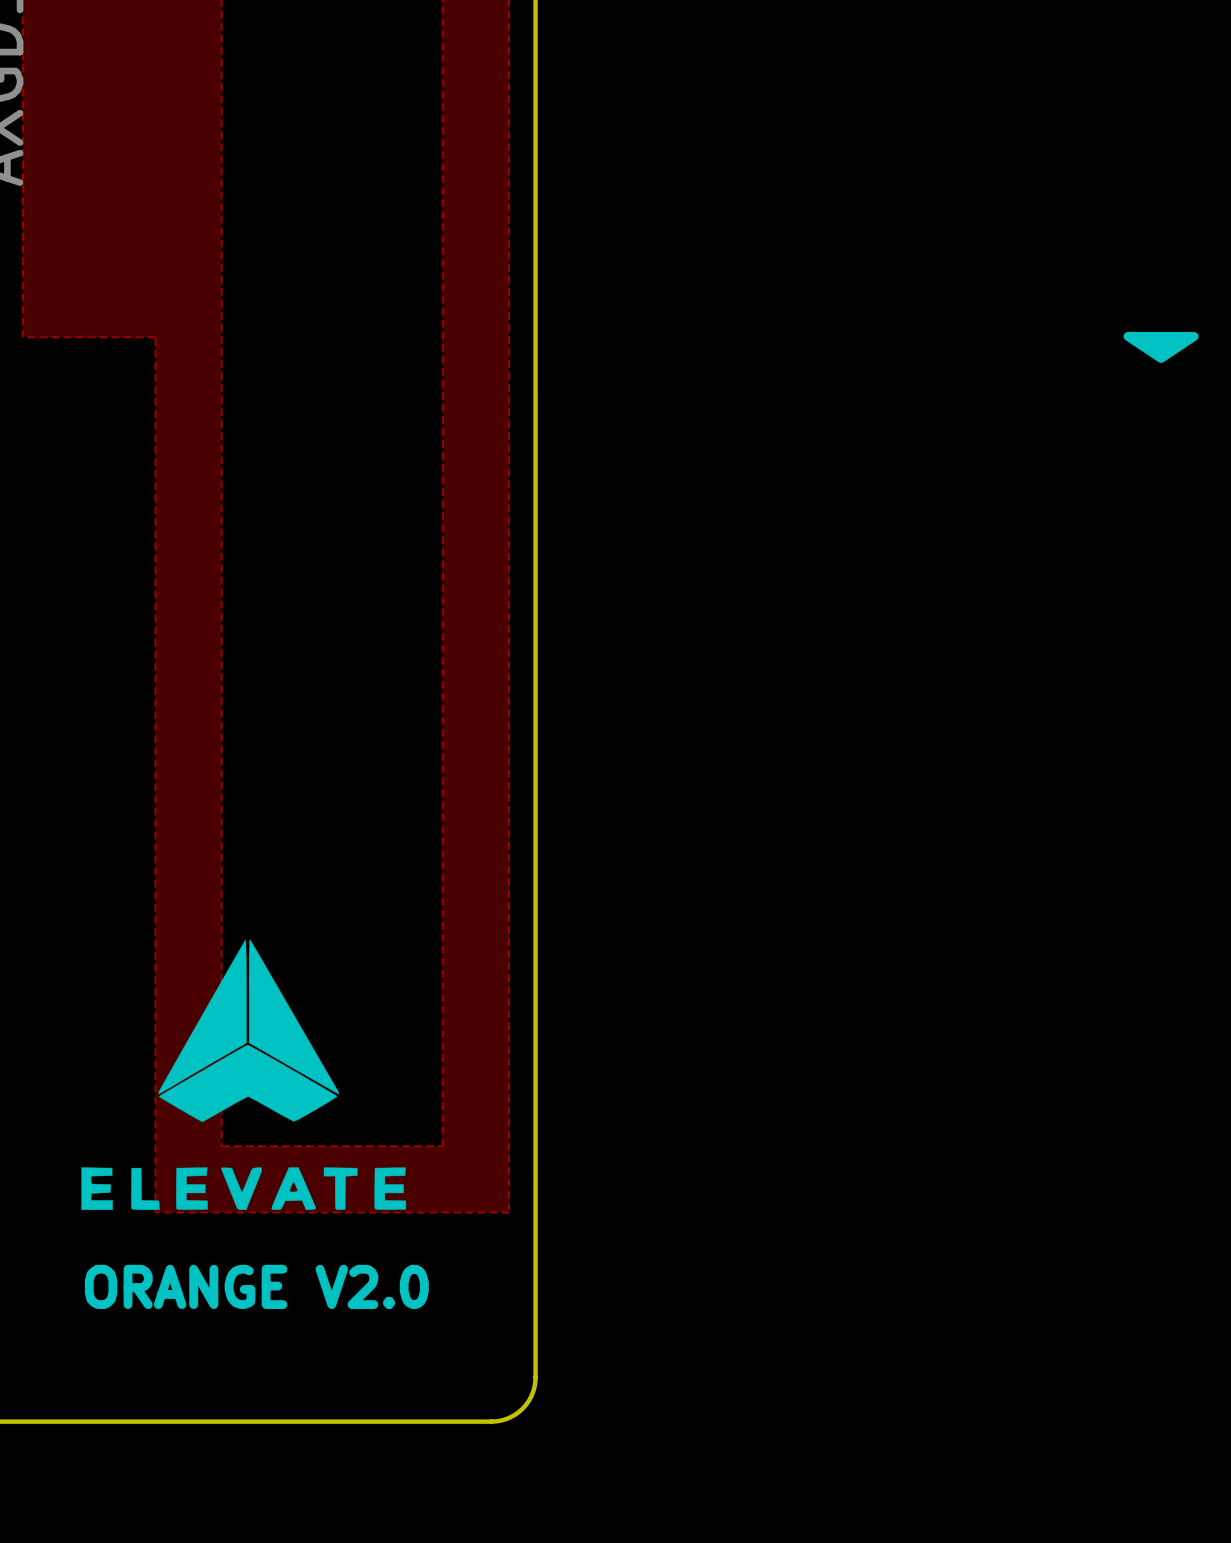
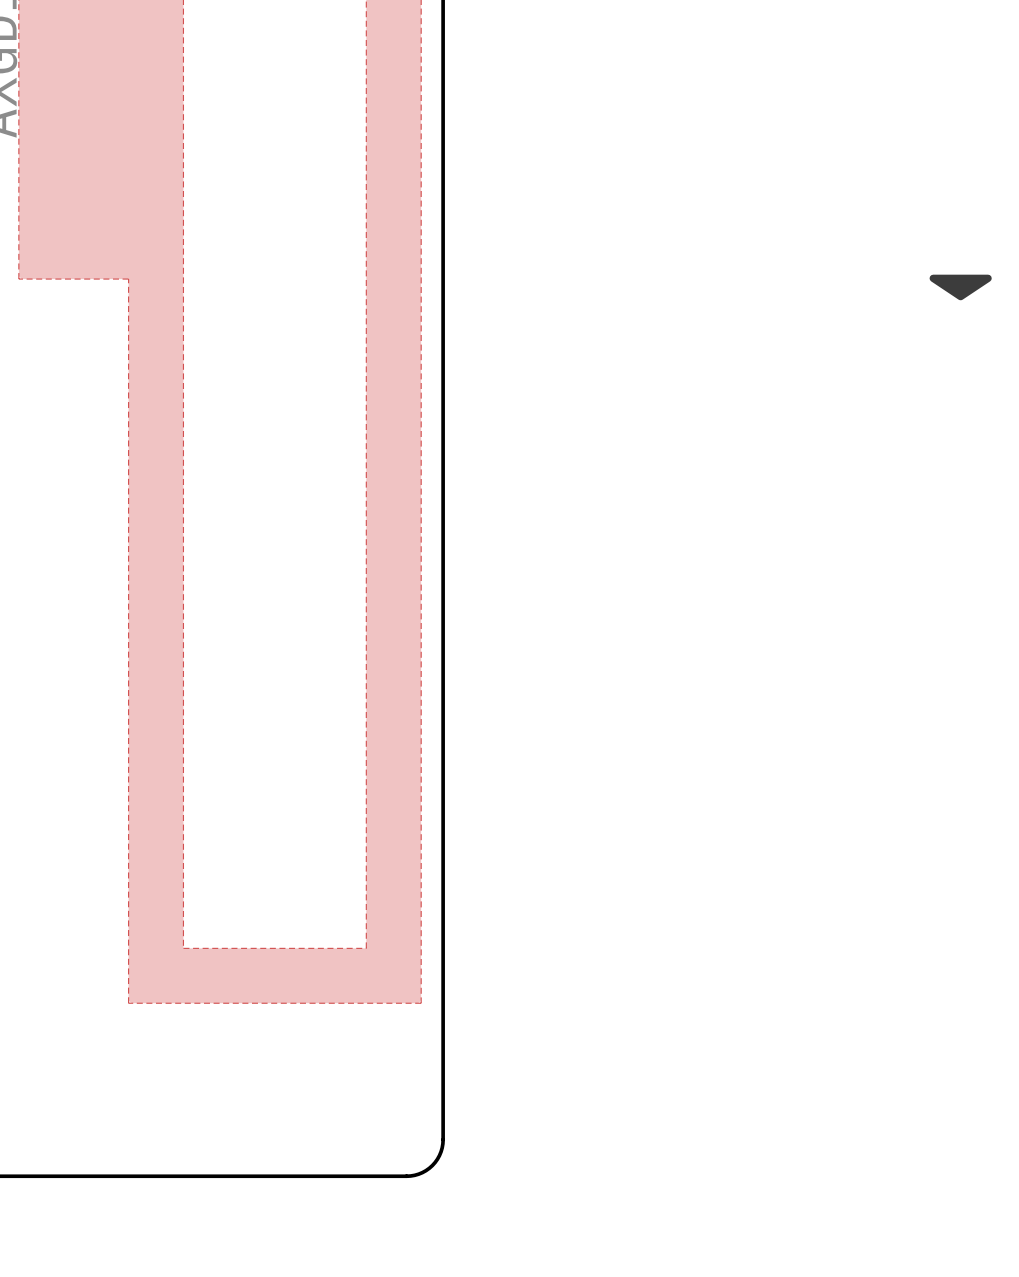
drawing: [81, 939, 407, 1211] -> none
text: ORANGE V2.0 (256, 1286) -> none

